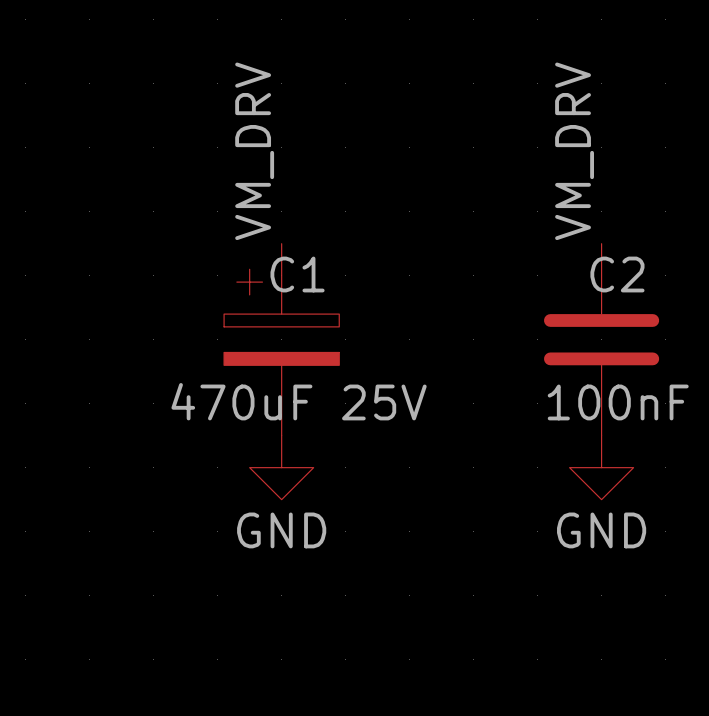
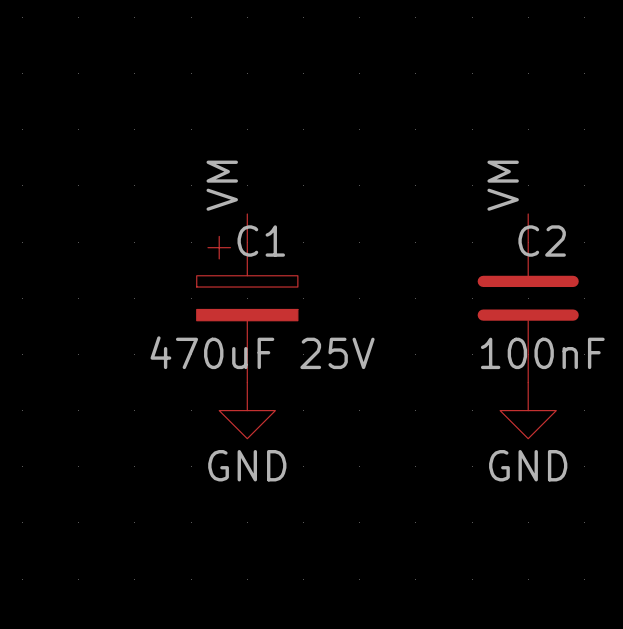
label: VM_DRV (254, 151) -> VM (222, 185)
label: VM_DRV (574, 151) -> VM (503, 185)

